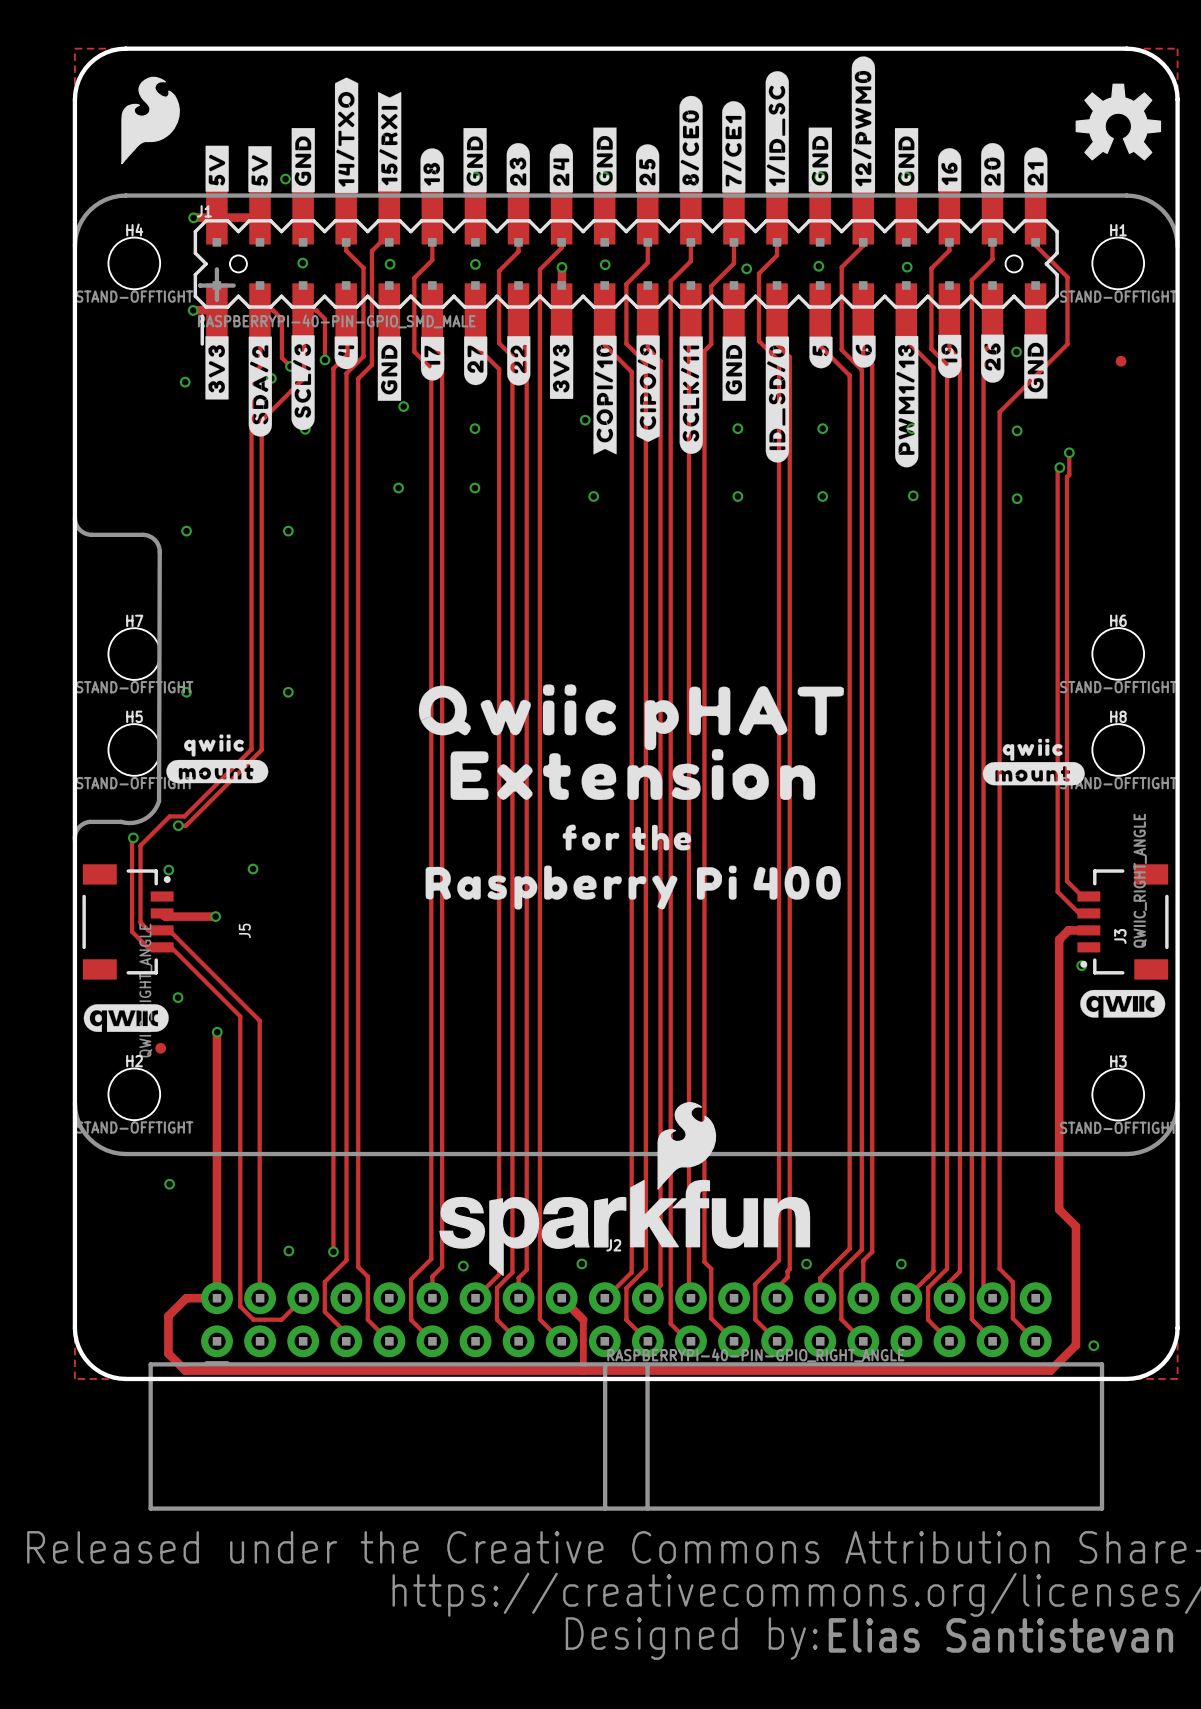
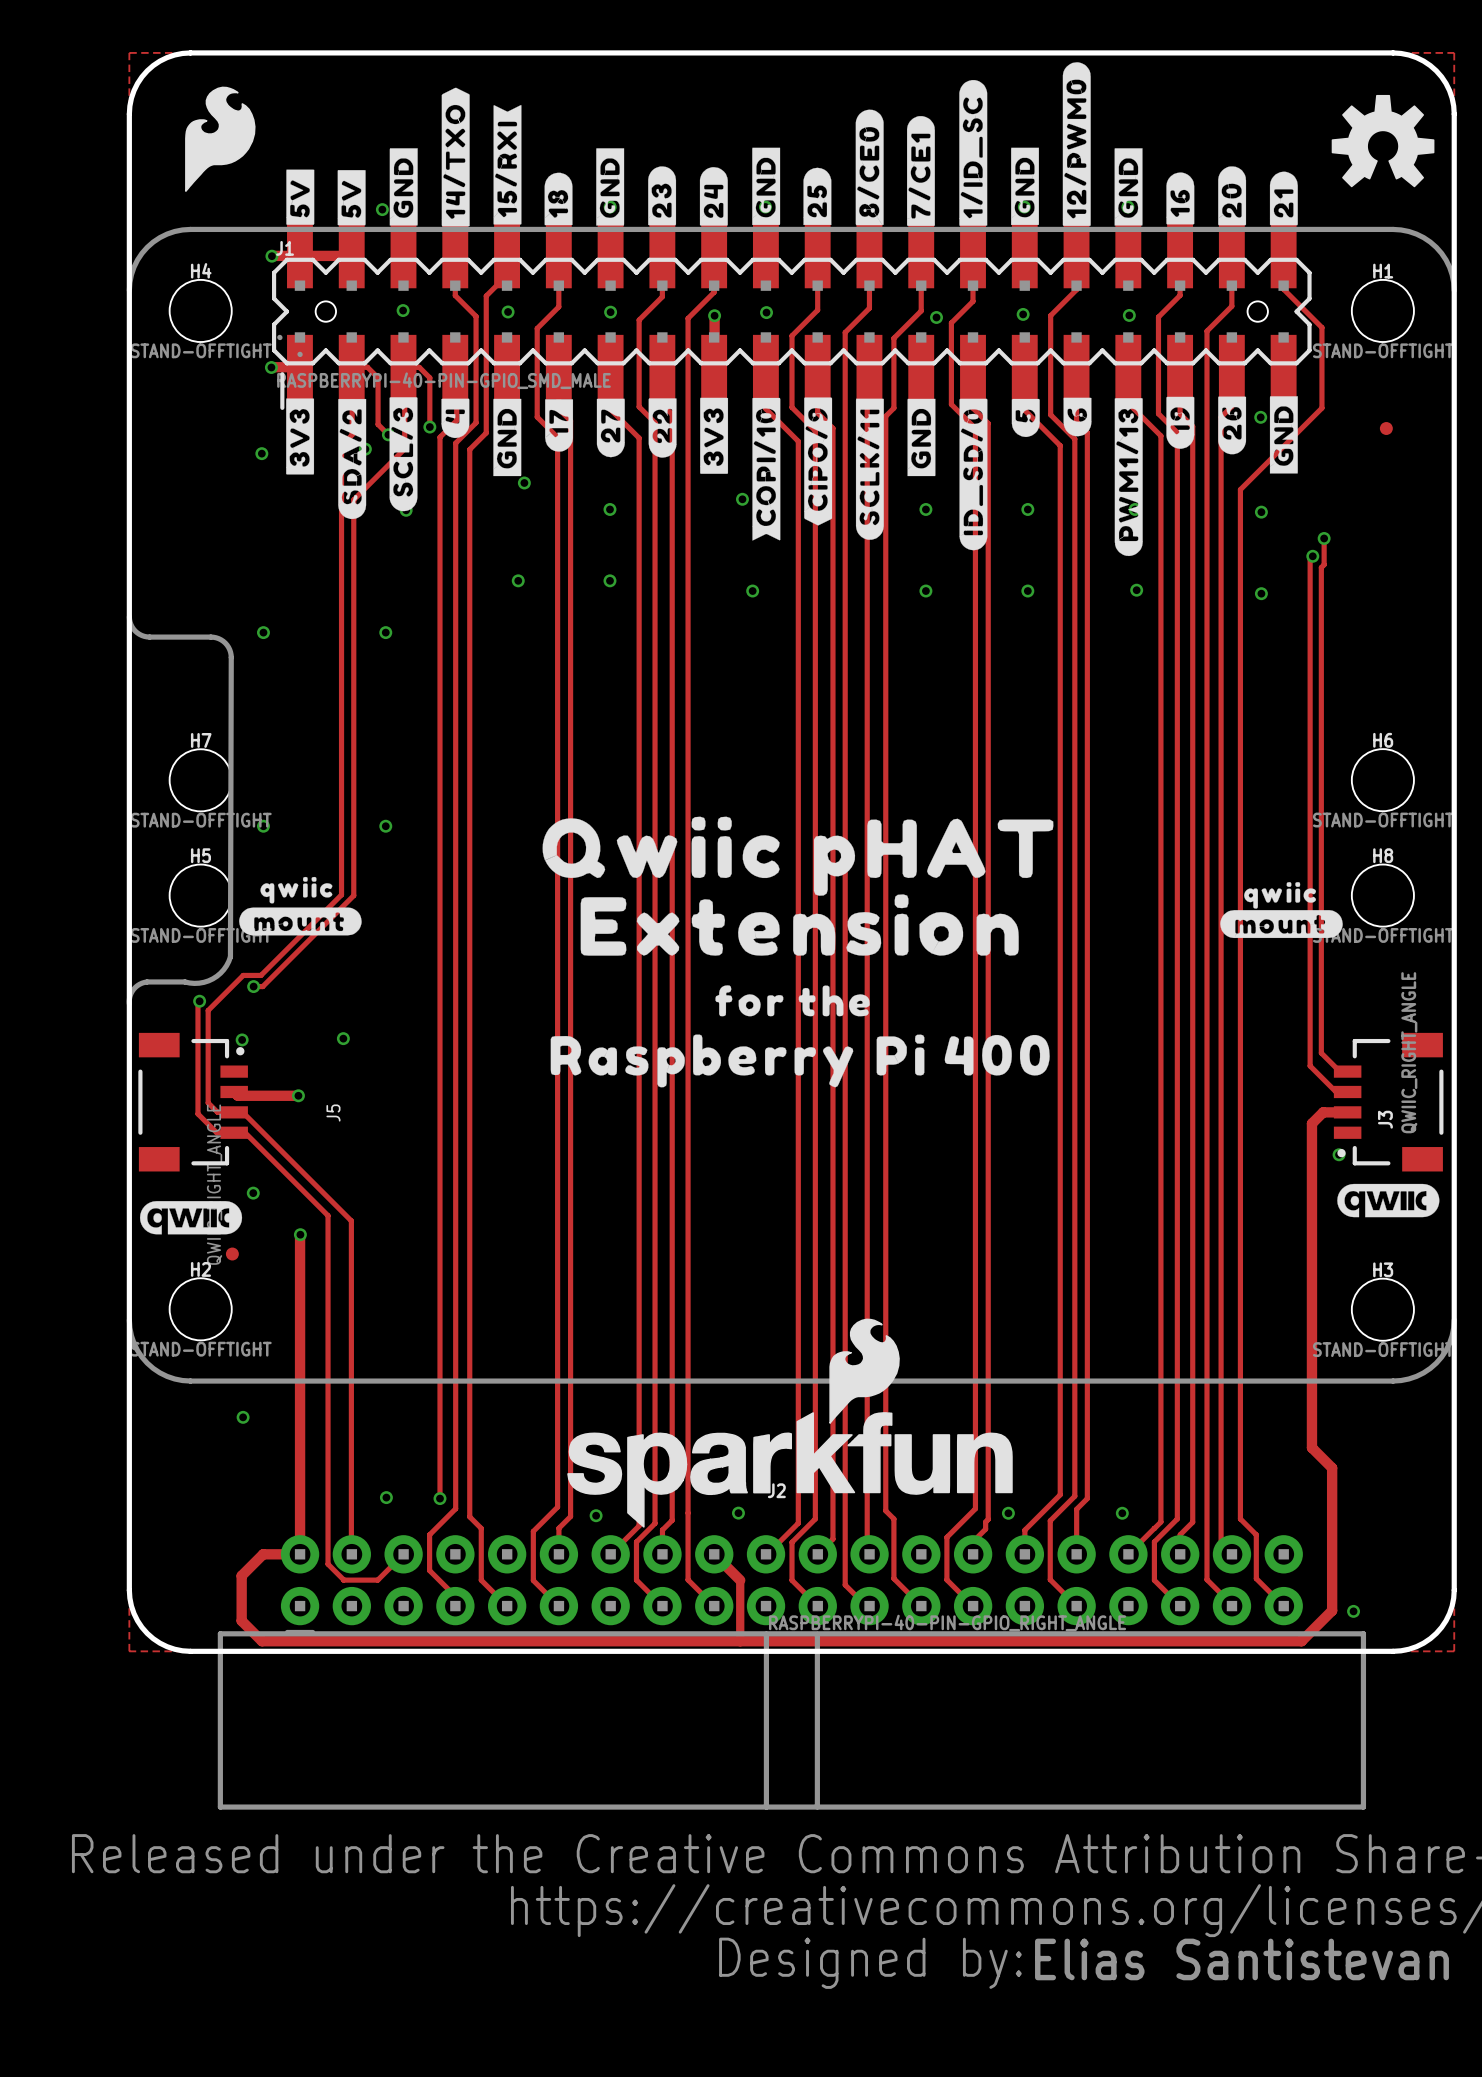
line: (216, 269) (216, 299) -> none
line: (200, 285) (233, 285) -> none

